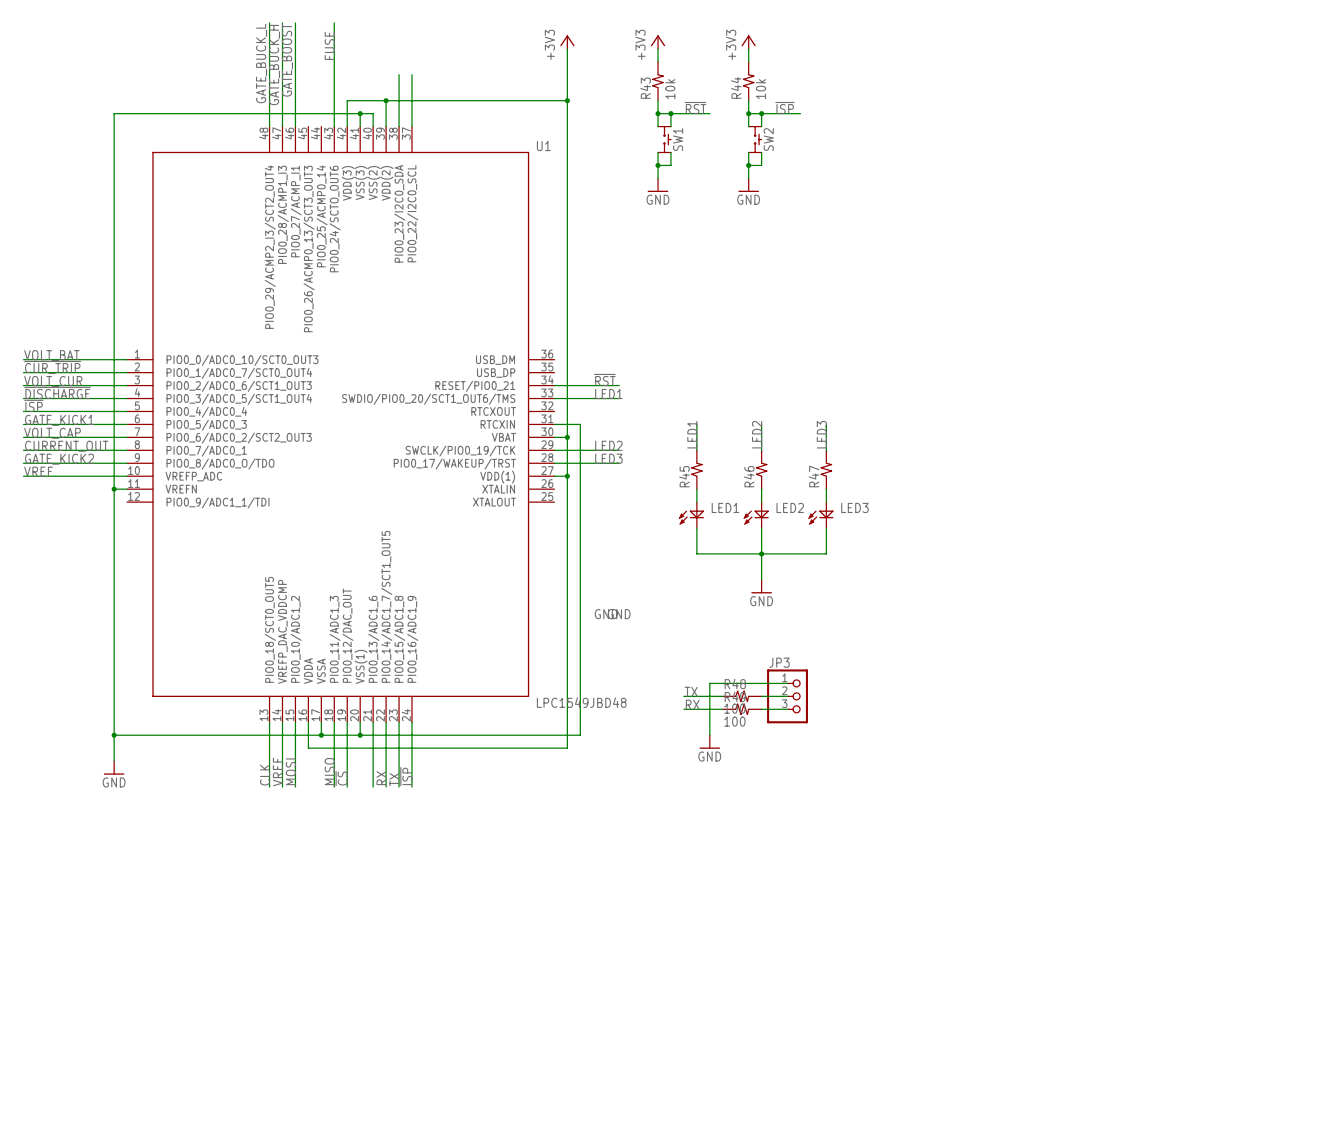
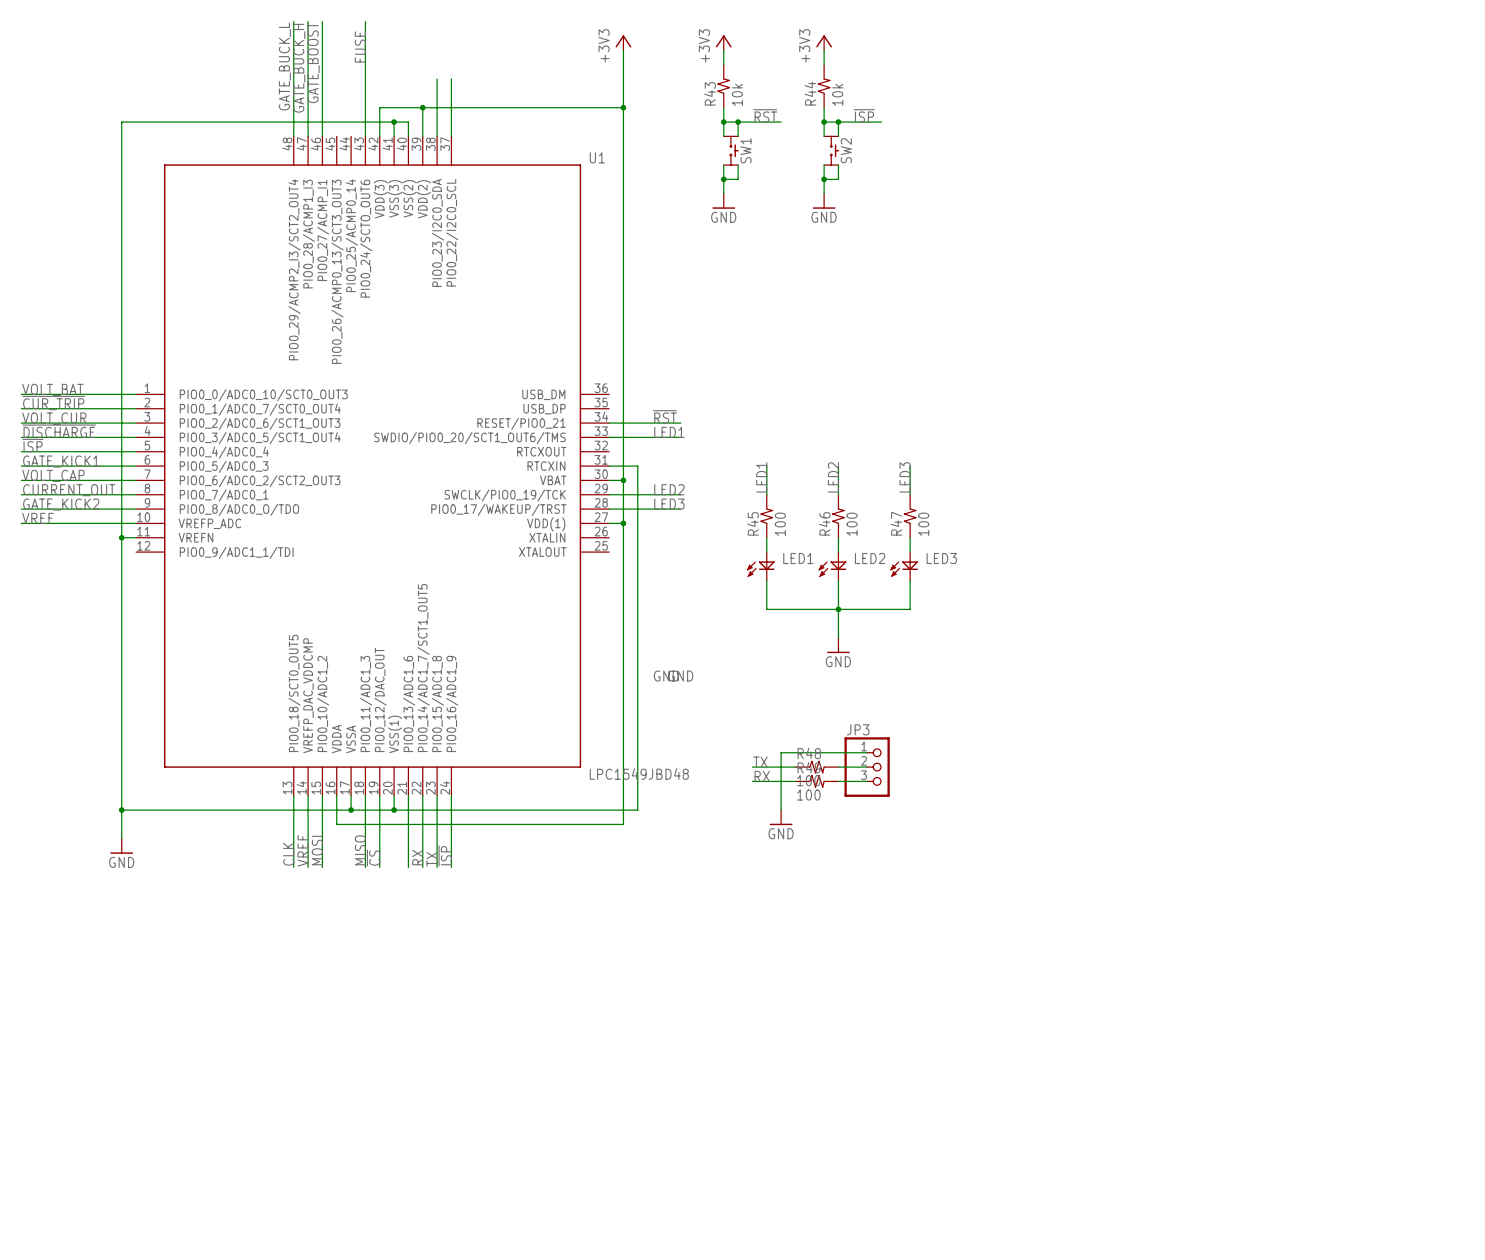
R45 value: none -> 100 (780, 524)
R46 value: none -> 100 (852, 524)
R47 value: none -> 100 (923, 524)

